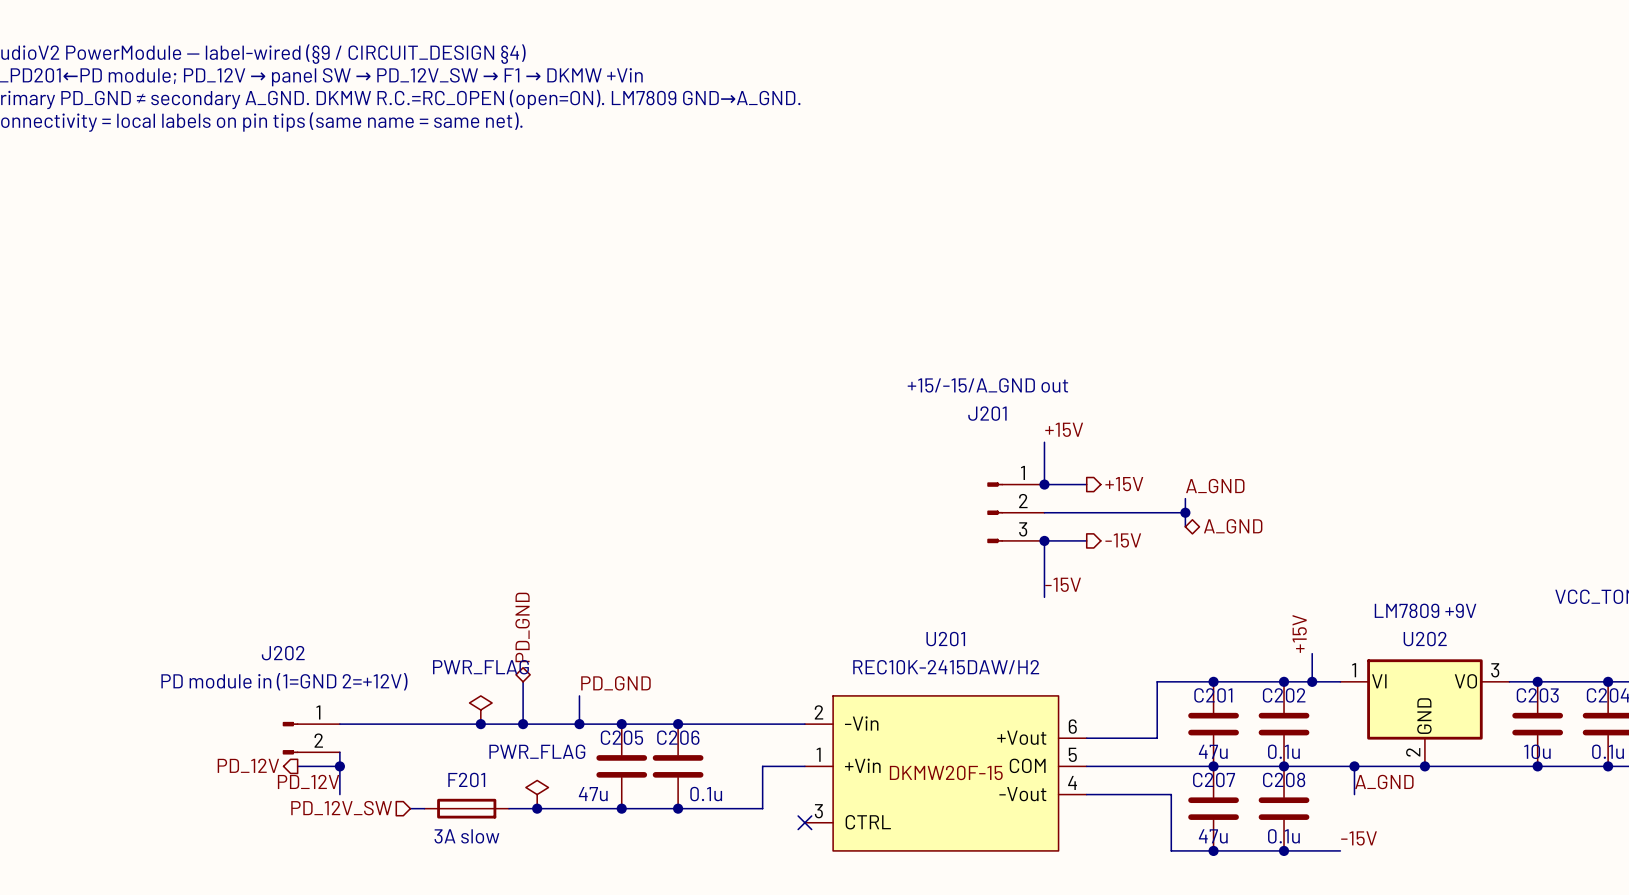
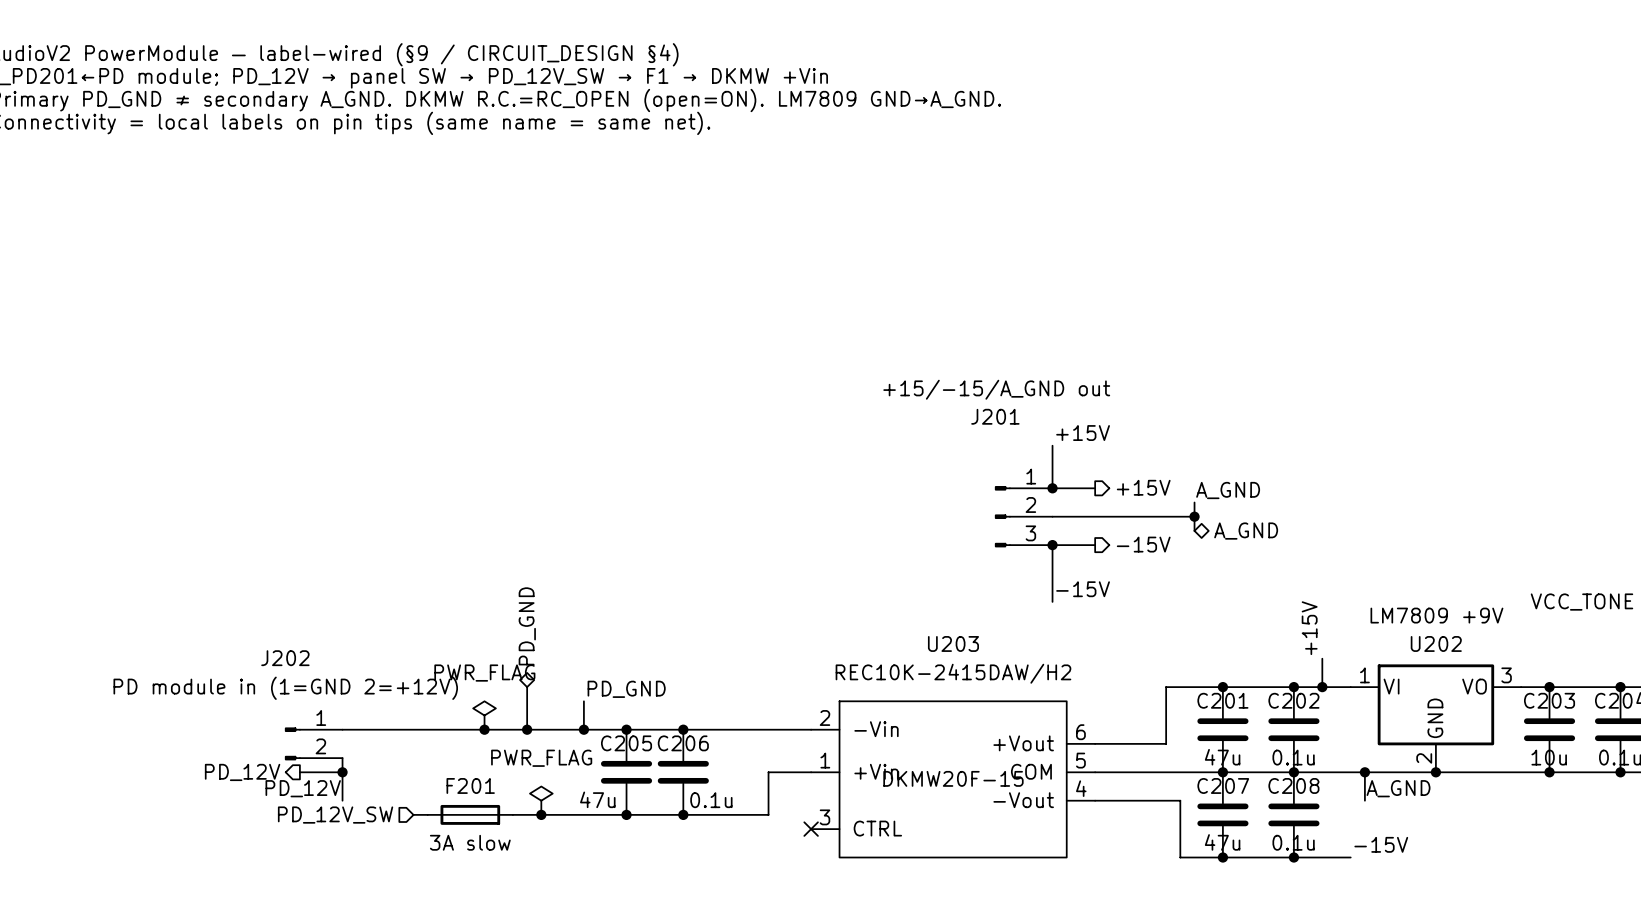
U201 name: U201 (945, 639) -> U203 (953, 643)

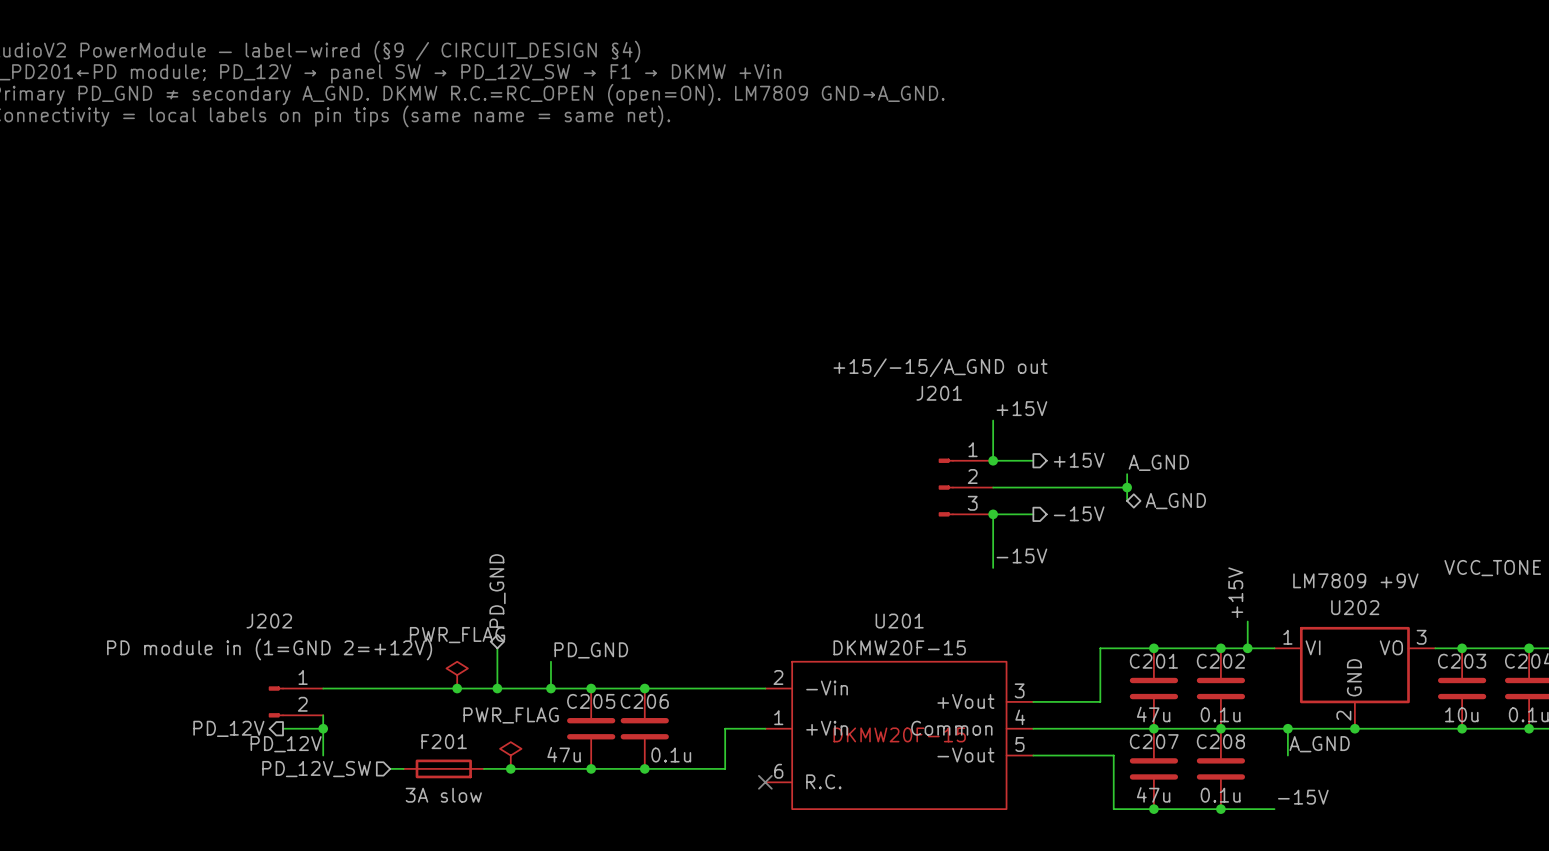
U203 name: U203 (953, 643) -> U201 (899, 621)
U203 value: REC10K-2415DAW/H2 (953, 673) -> DKMW20F-15 (899, 647)
U203 pin number: 6 (1080, 732) -> 3 (1019, 690)
U203 pin number: 5 (1080, 760) -> 4 (1020, 717)
U203 pin name: COM (1031, 771) -> Common (951, 728)
U203 pin number: 4 (1081, 788) -> 5 (1019, 744)
U203 pin number: 3 (824, 817) -> 6 (778, 771)
U203 pin name: CTRL (877, 828) -> R.C. (823, 781)

